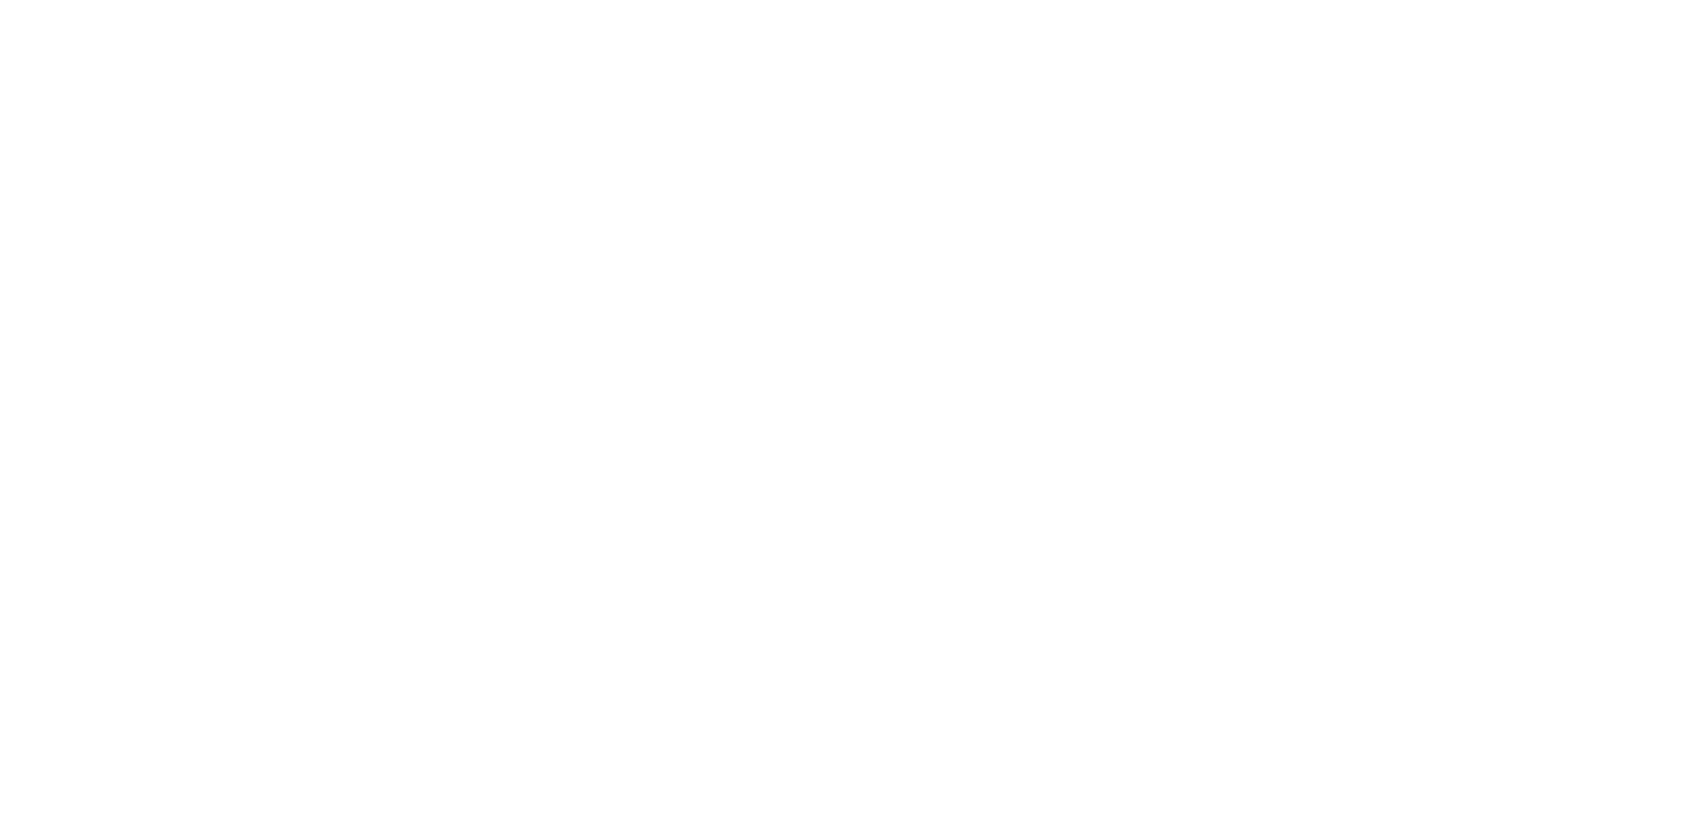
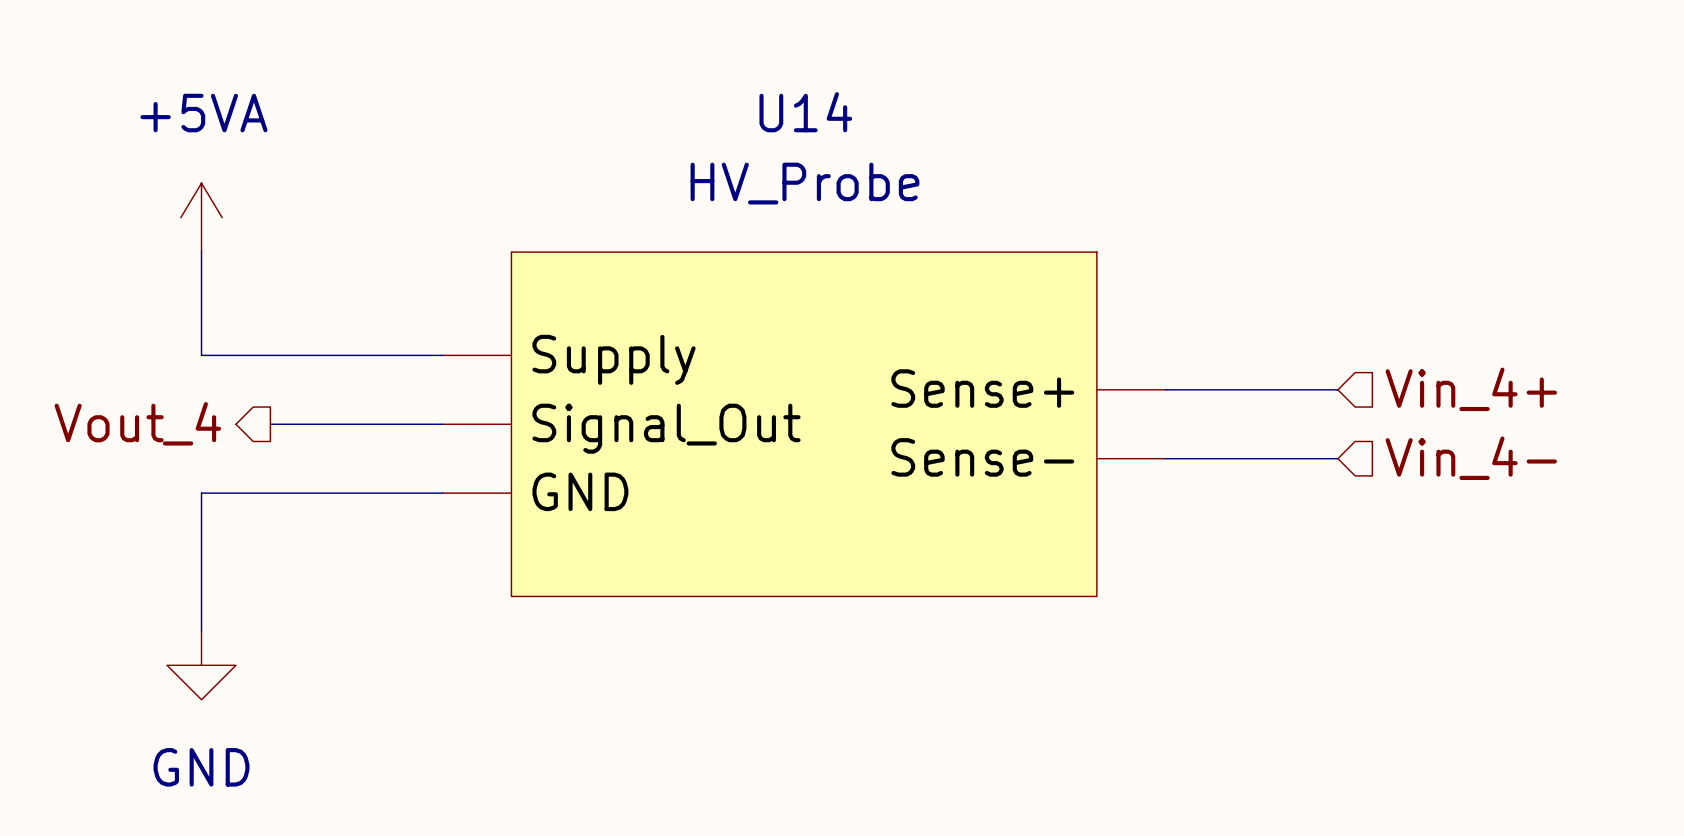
power symbol: none -> +5VA (201, 217)
wire: none -> (201, 252) (201, 355) (442, 355)
wire: none -> (1165, 389) (1337, 389)
hierarchical label: none -> Vin_4+ (1471, 389)
hierarchical label: none -> Vout_4 (137, 423)
wire: none -> (270, 424) (442, 424)
U14: none -> HV_Probe (804, 424)
wire: none -> (1165, 458) (1337, 458)
hierarchical label: none -> Vin_4- (1471, 458)
wire: none -> (442, 493) (201, 493) (201, 630)
power symbol: none -> GND (201, 665)

